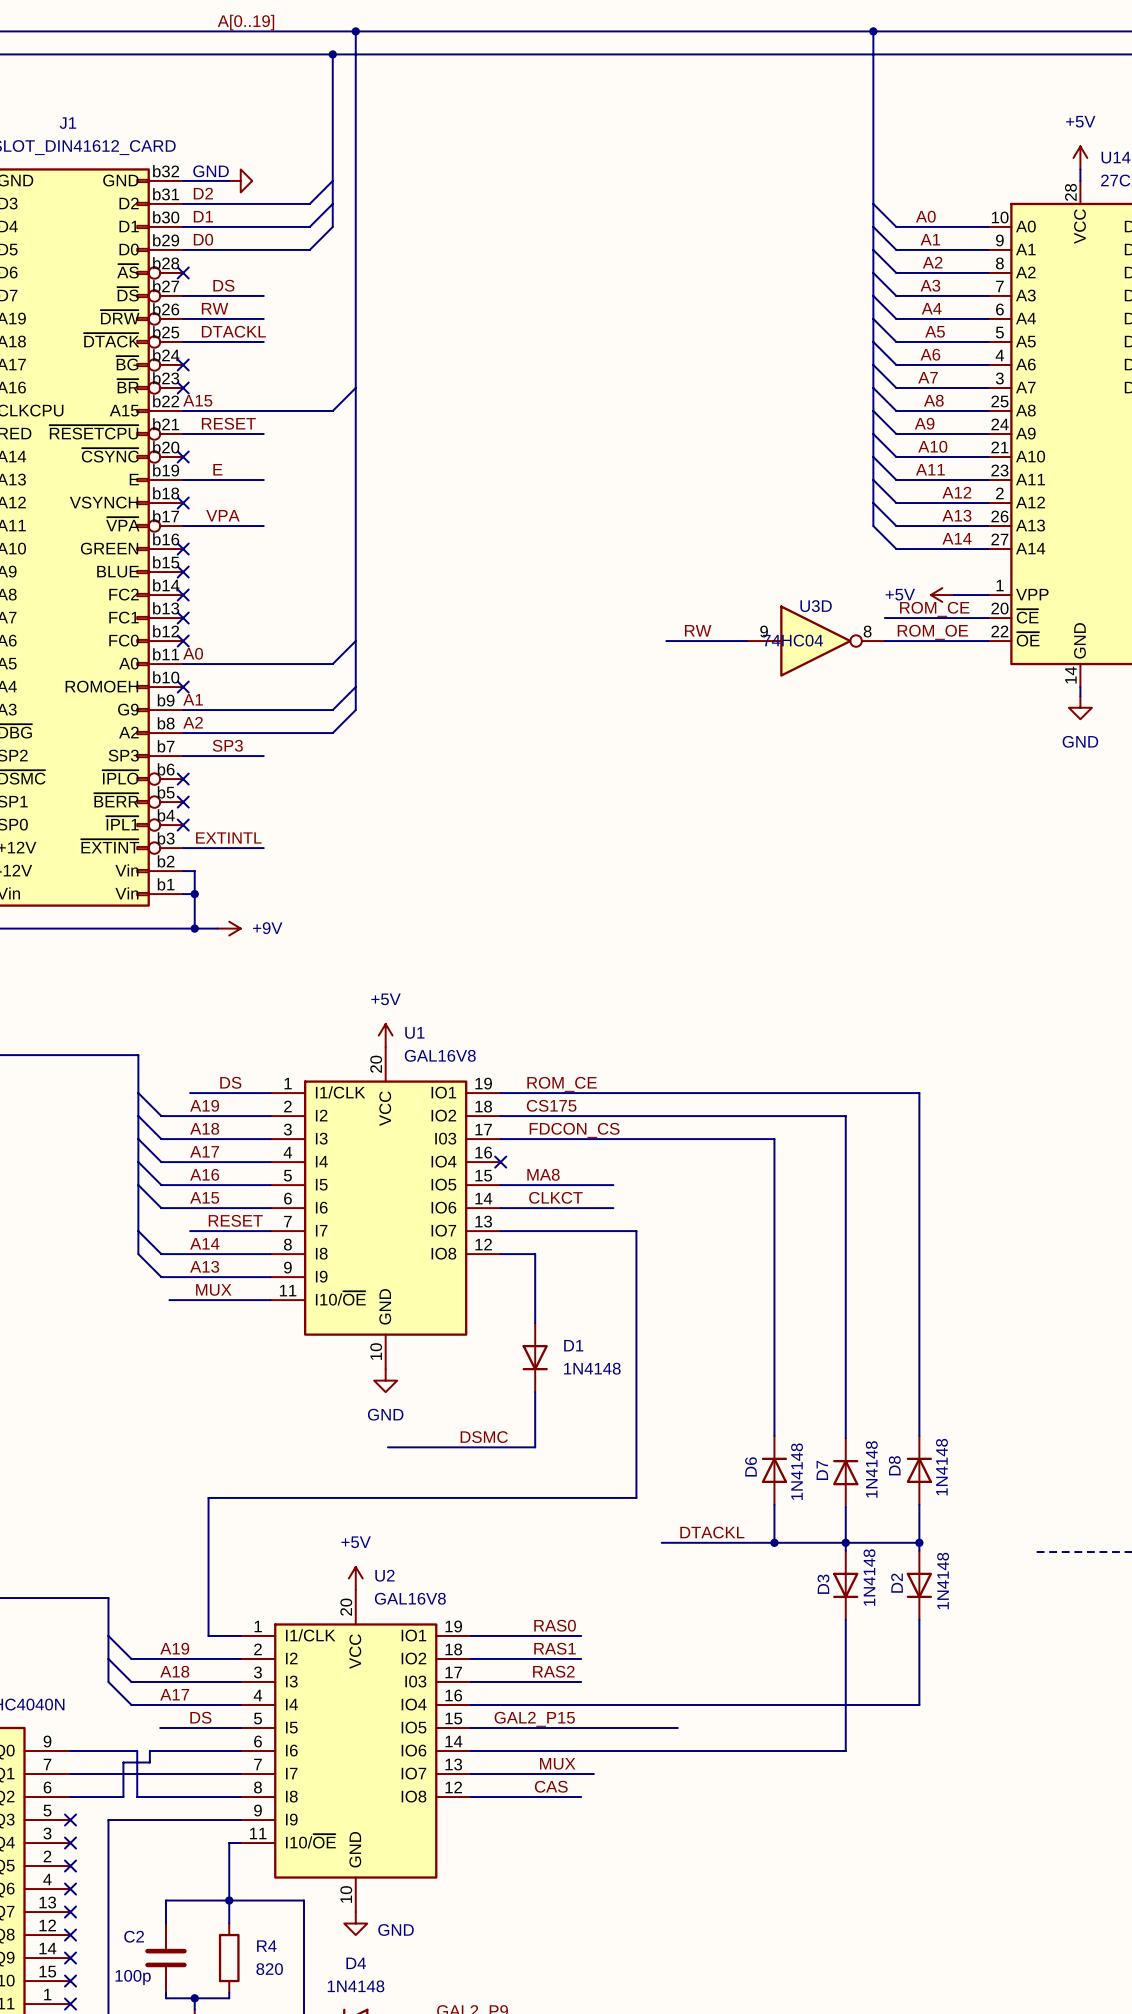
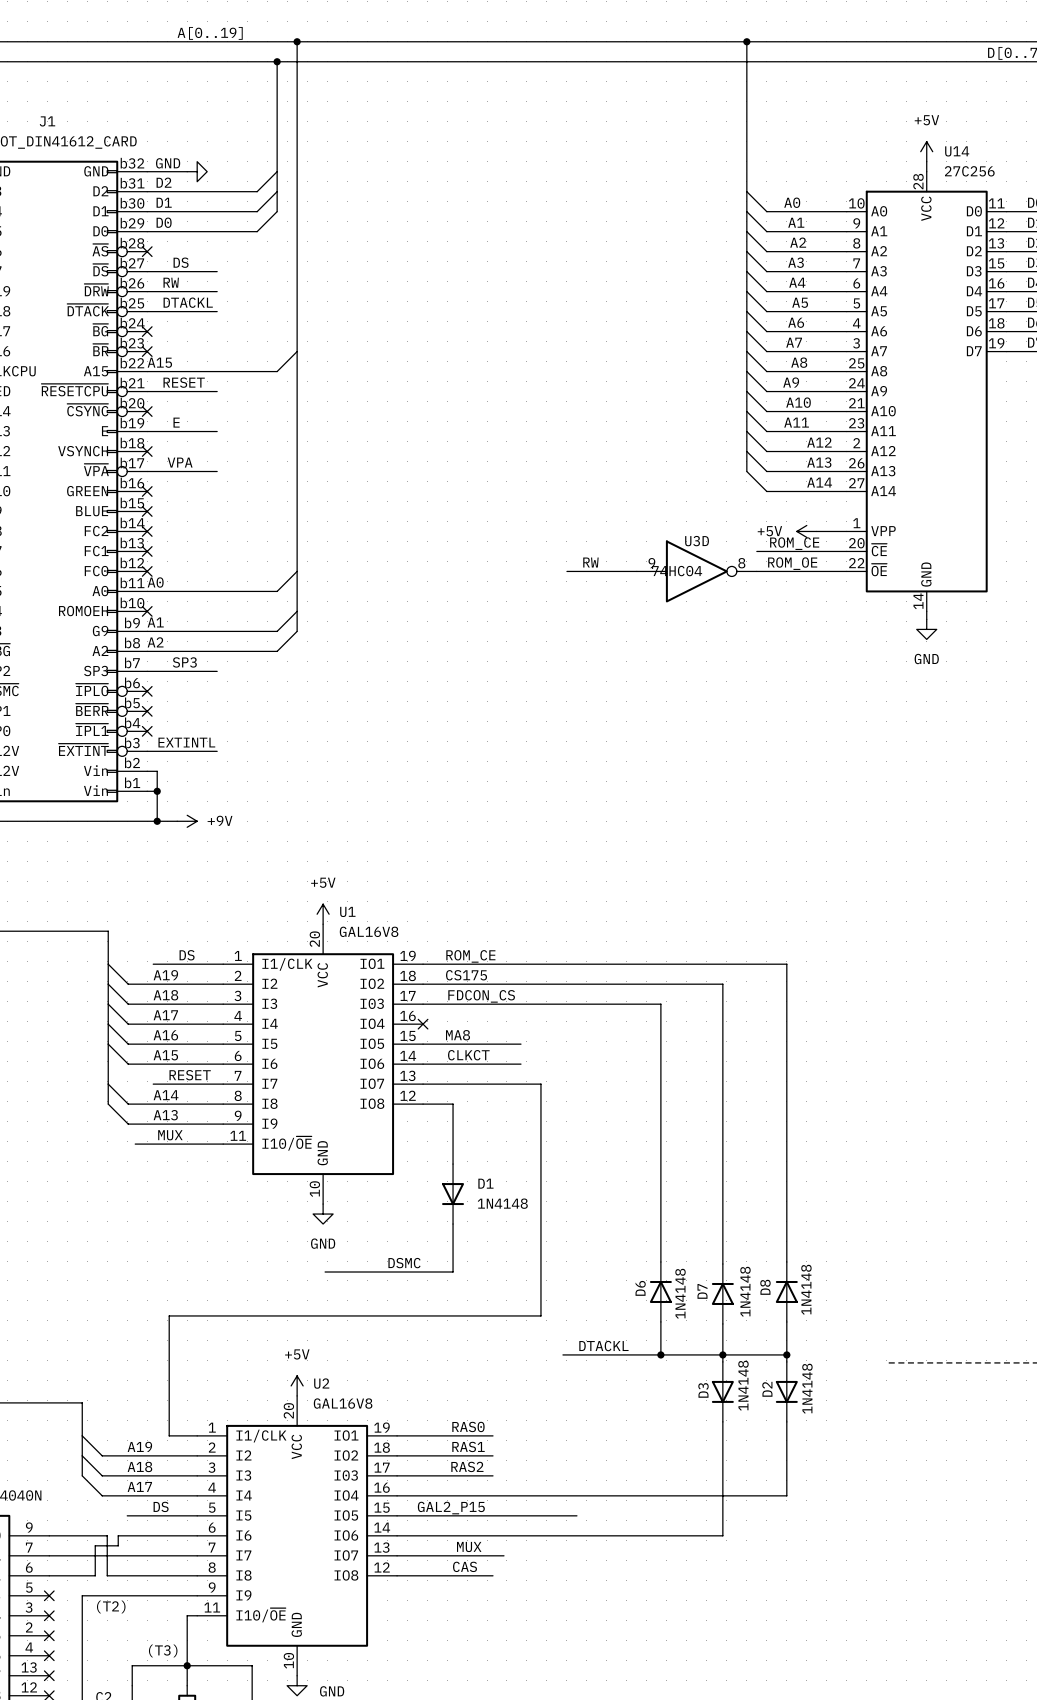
text: none -> (T2) (111, 1606)
text: none -> (T3) (163, 1650)

